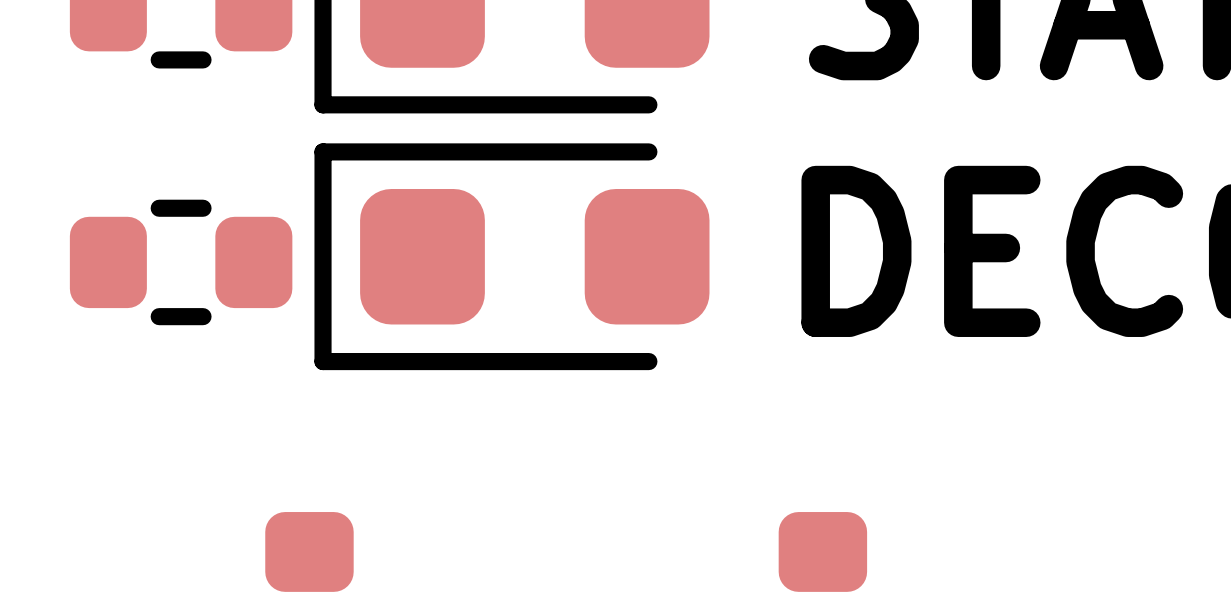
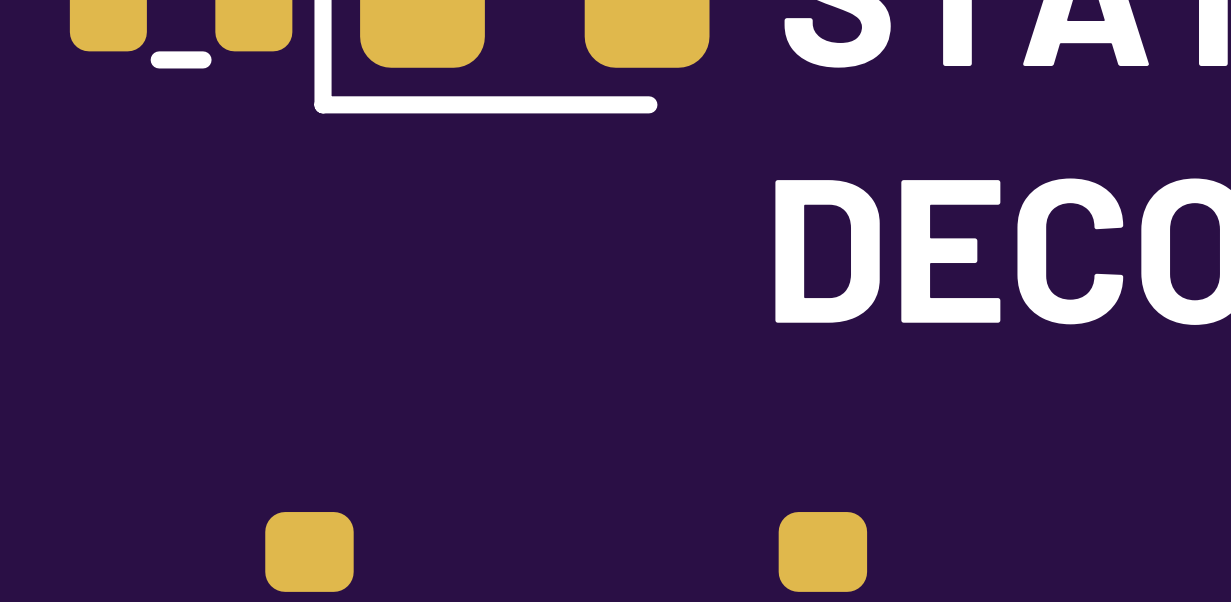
part: (511, 256) -> none
part: (181, 262) -> none

